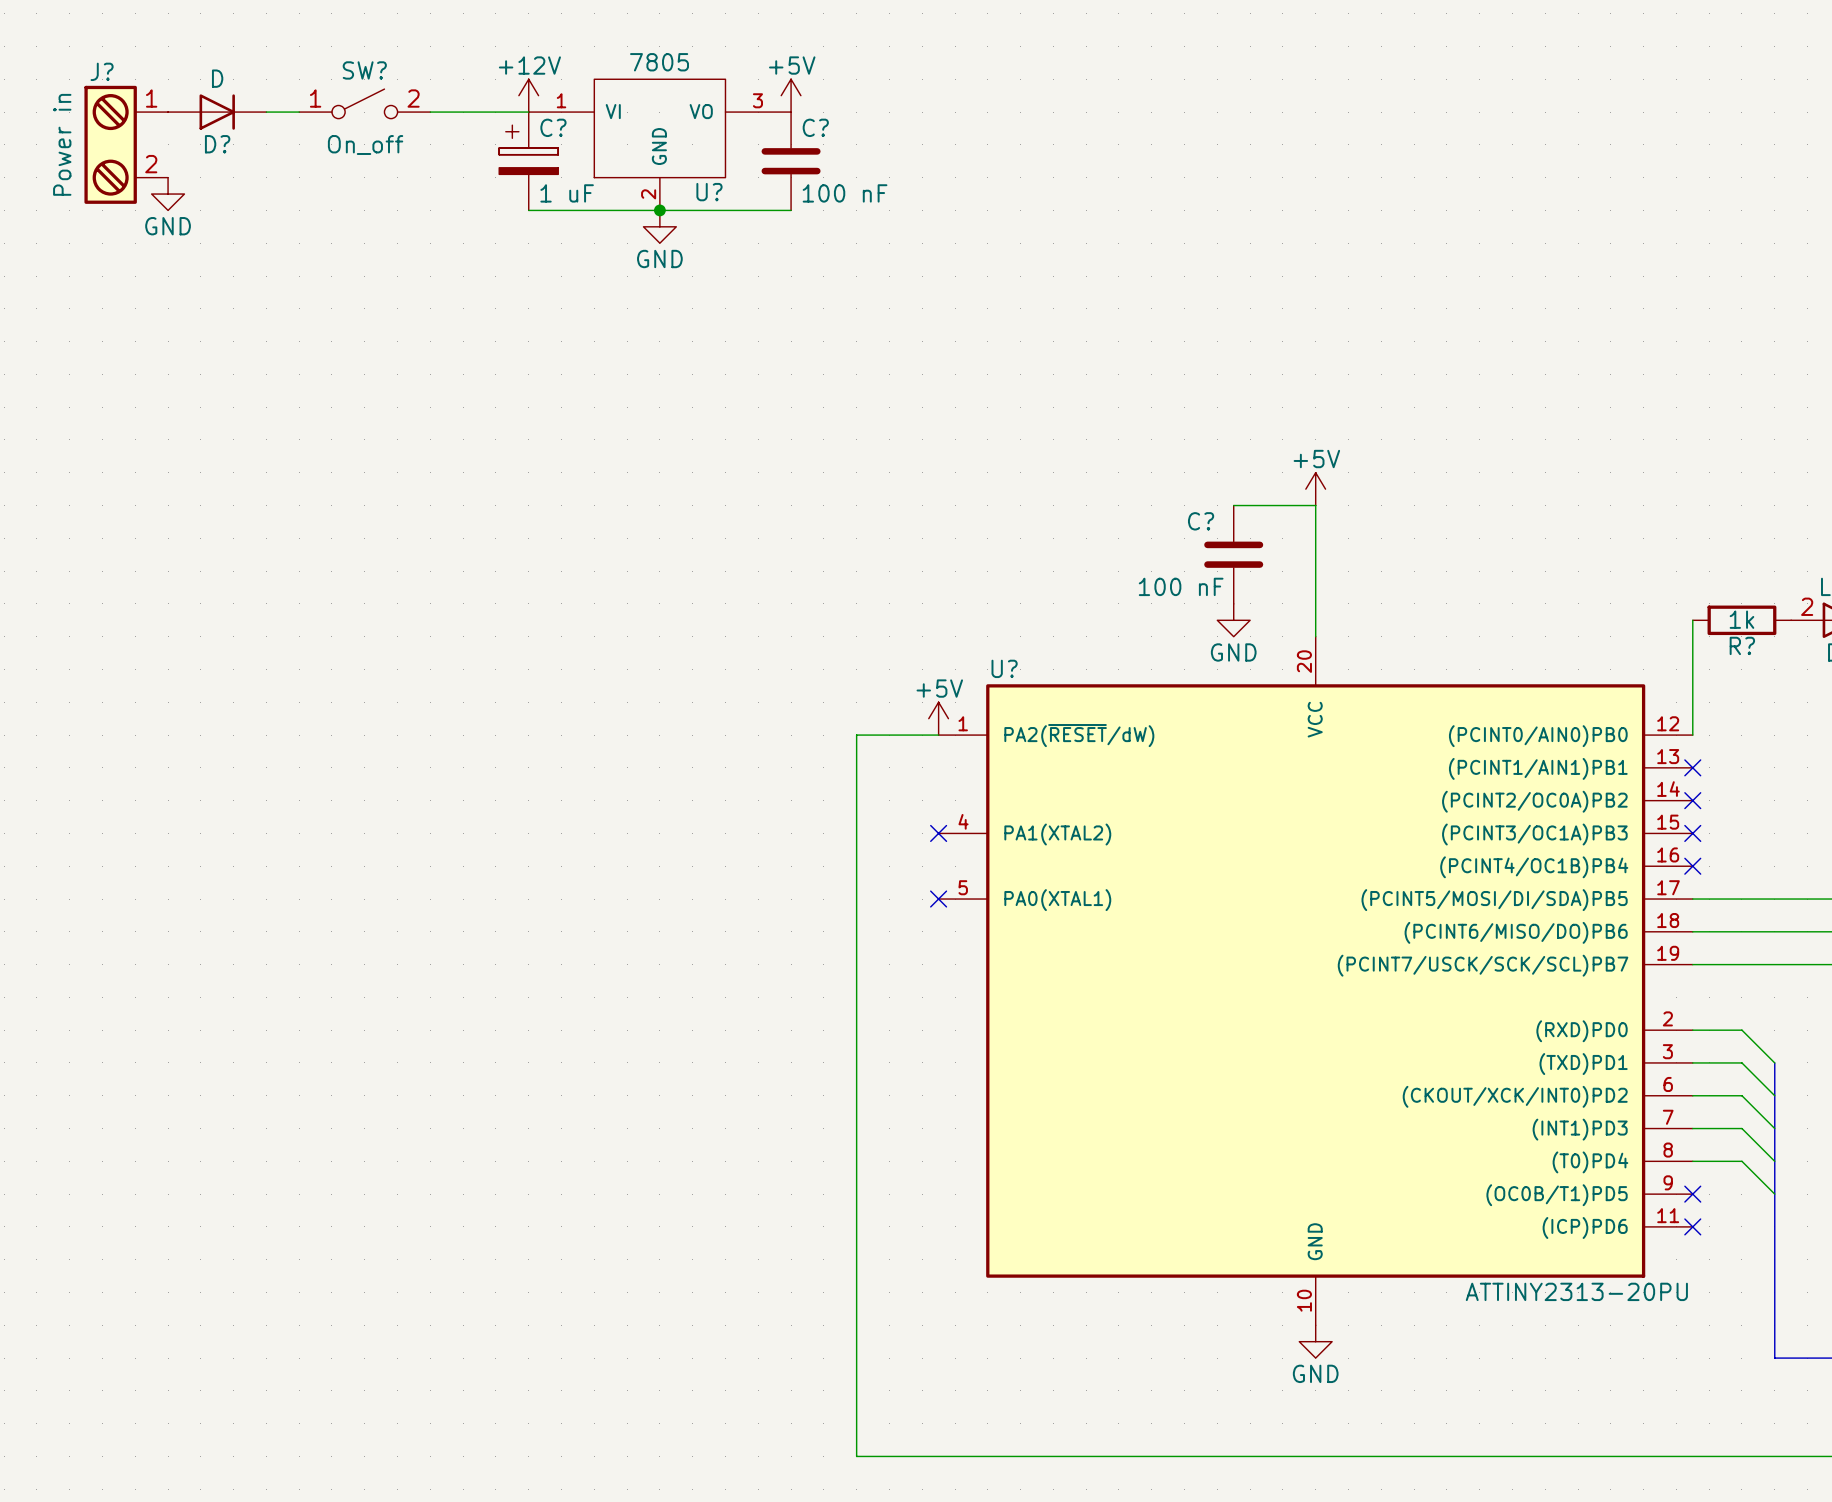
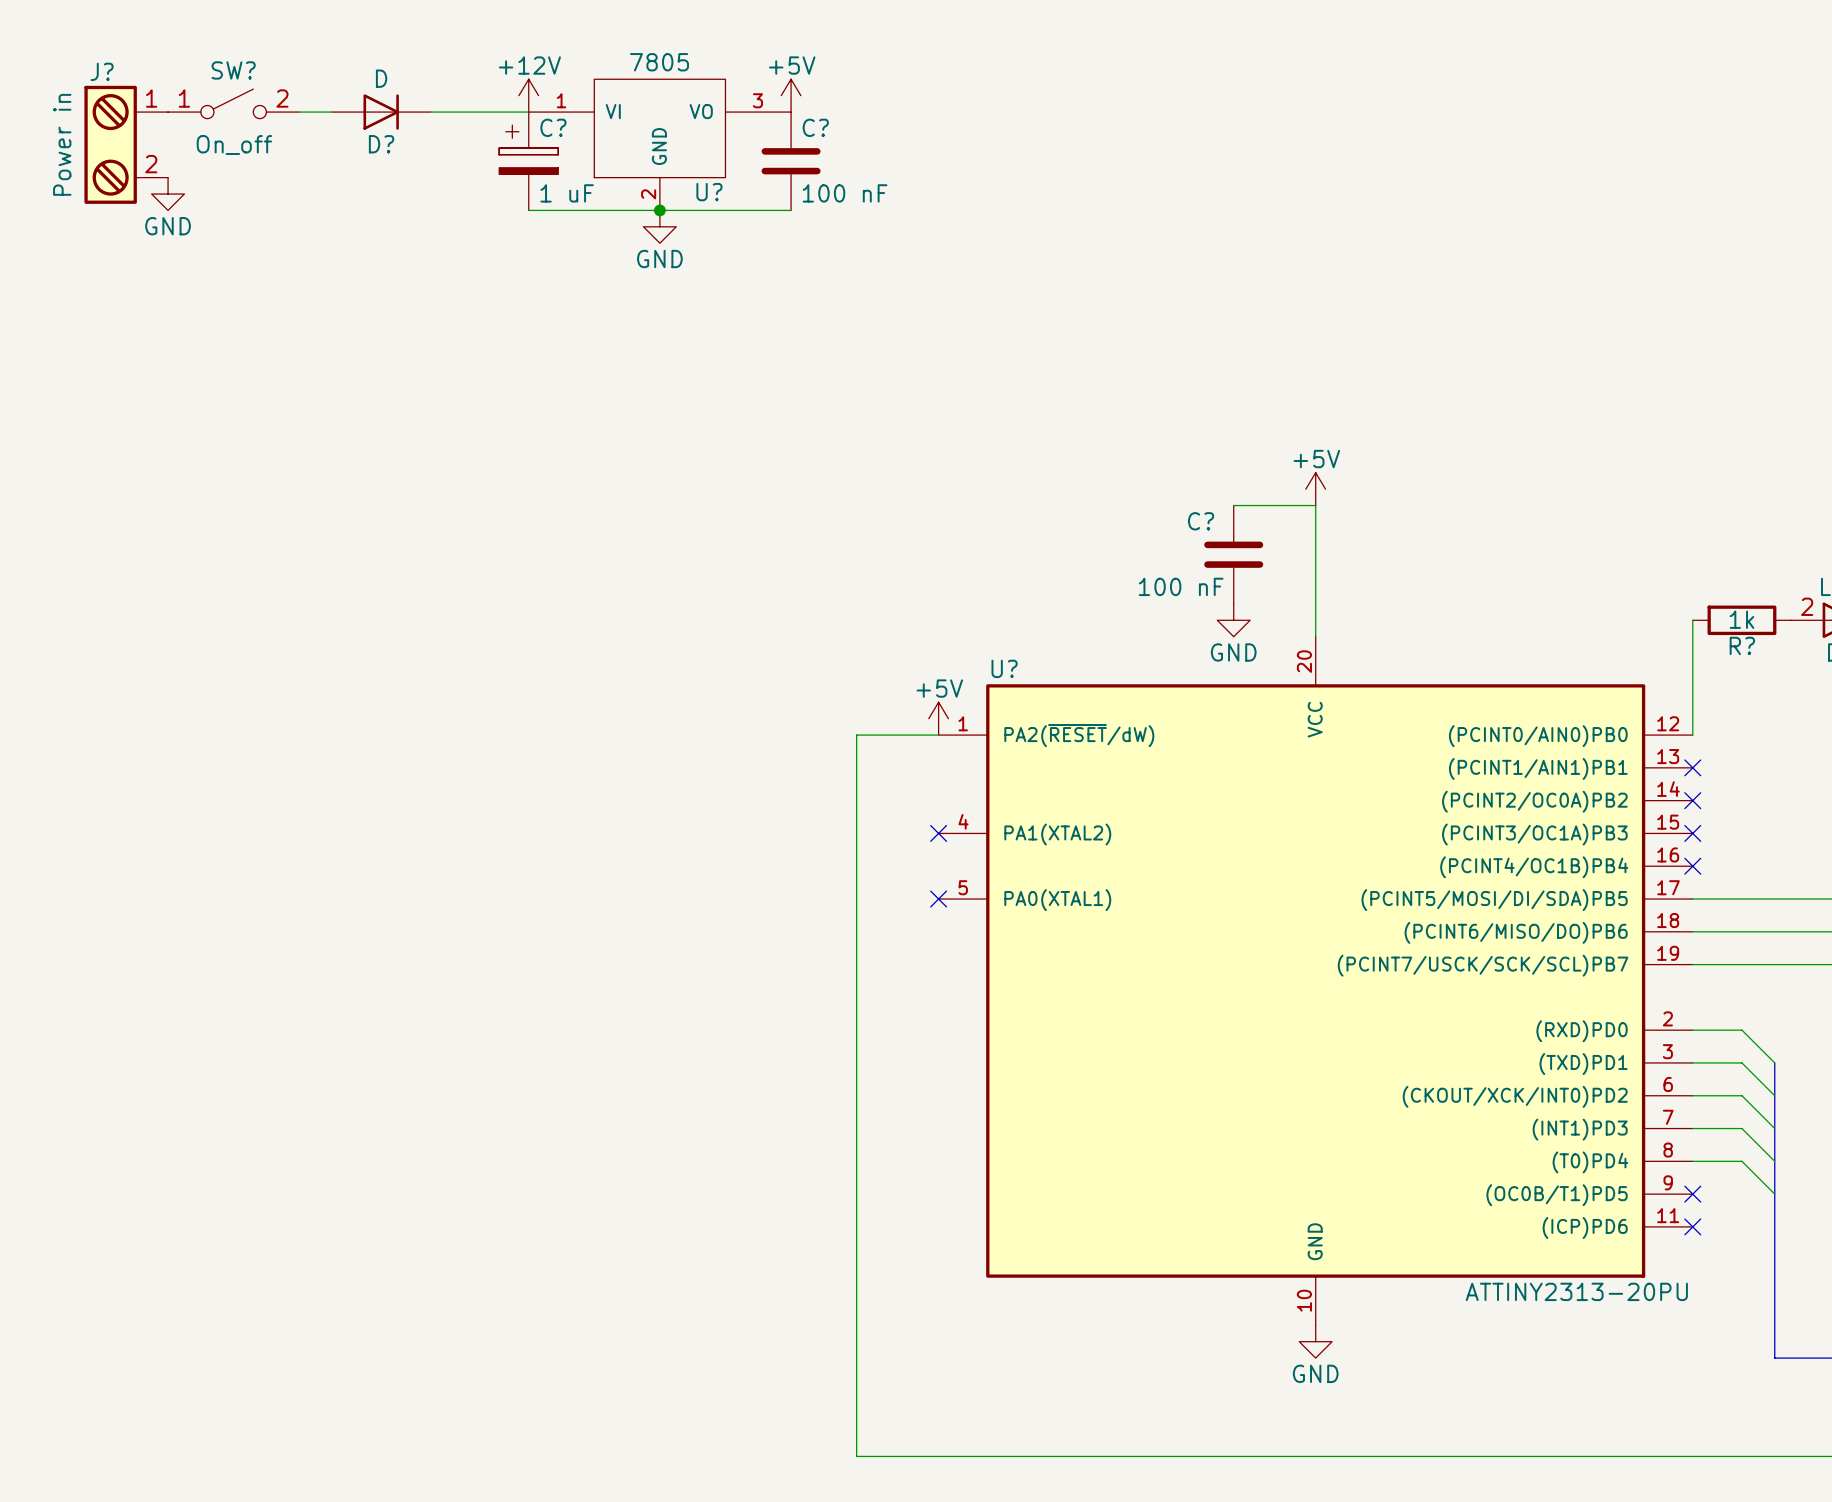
SW? position: (364, 103) -> (233, 103)
D? position: (217, 112) -> (381, 112)

